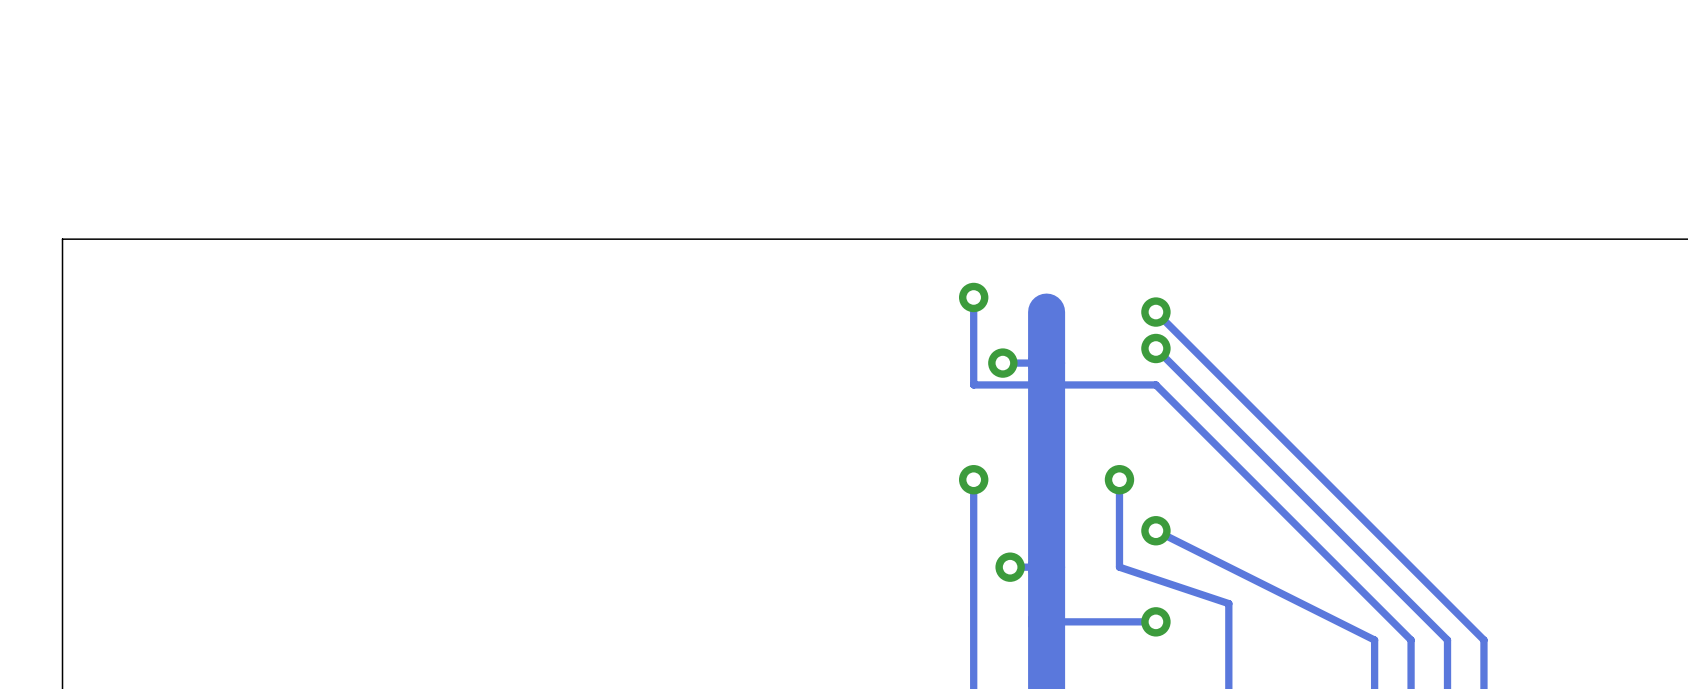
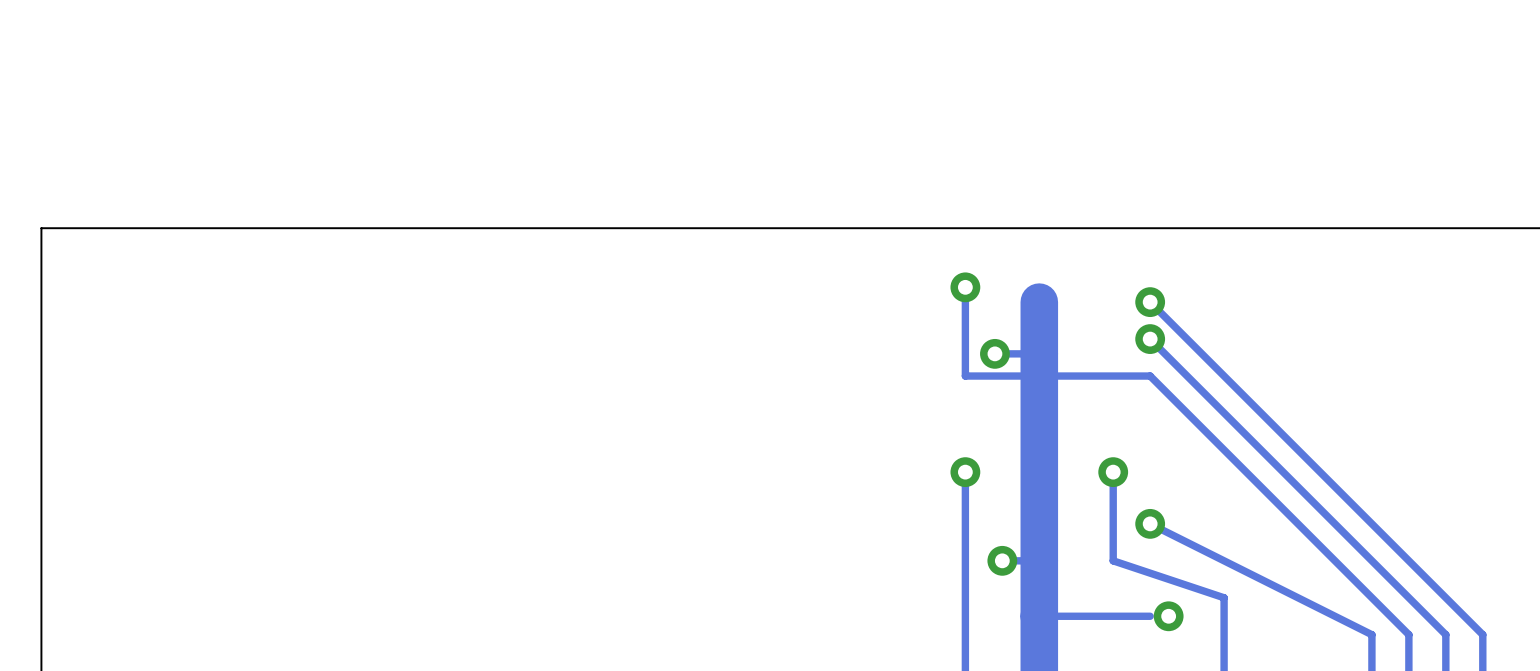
via position: (1155, 621) -> (1168, 616)

